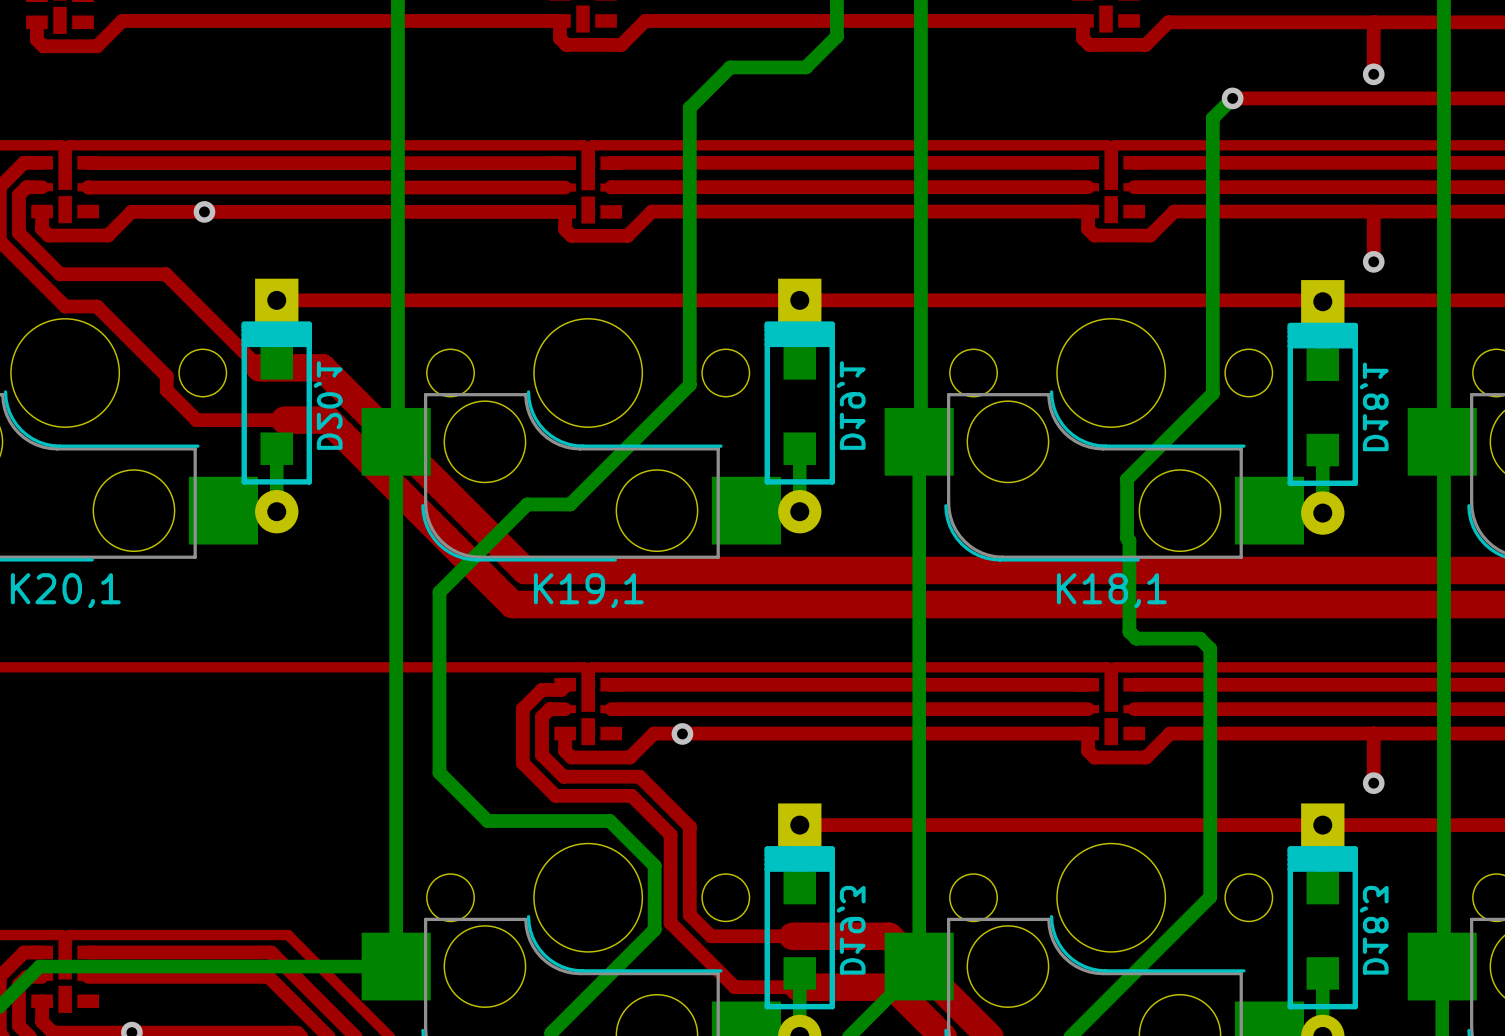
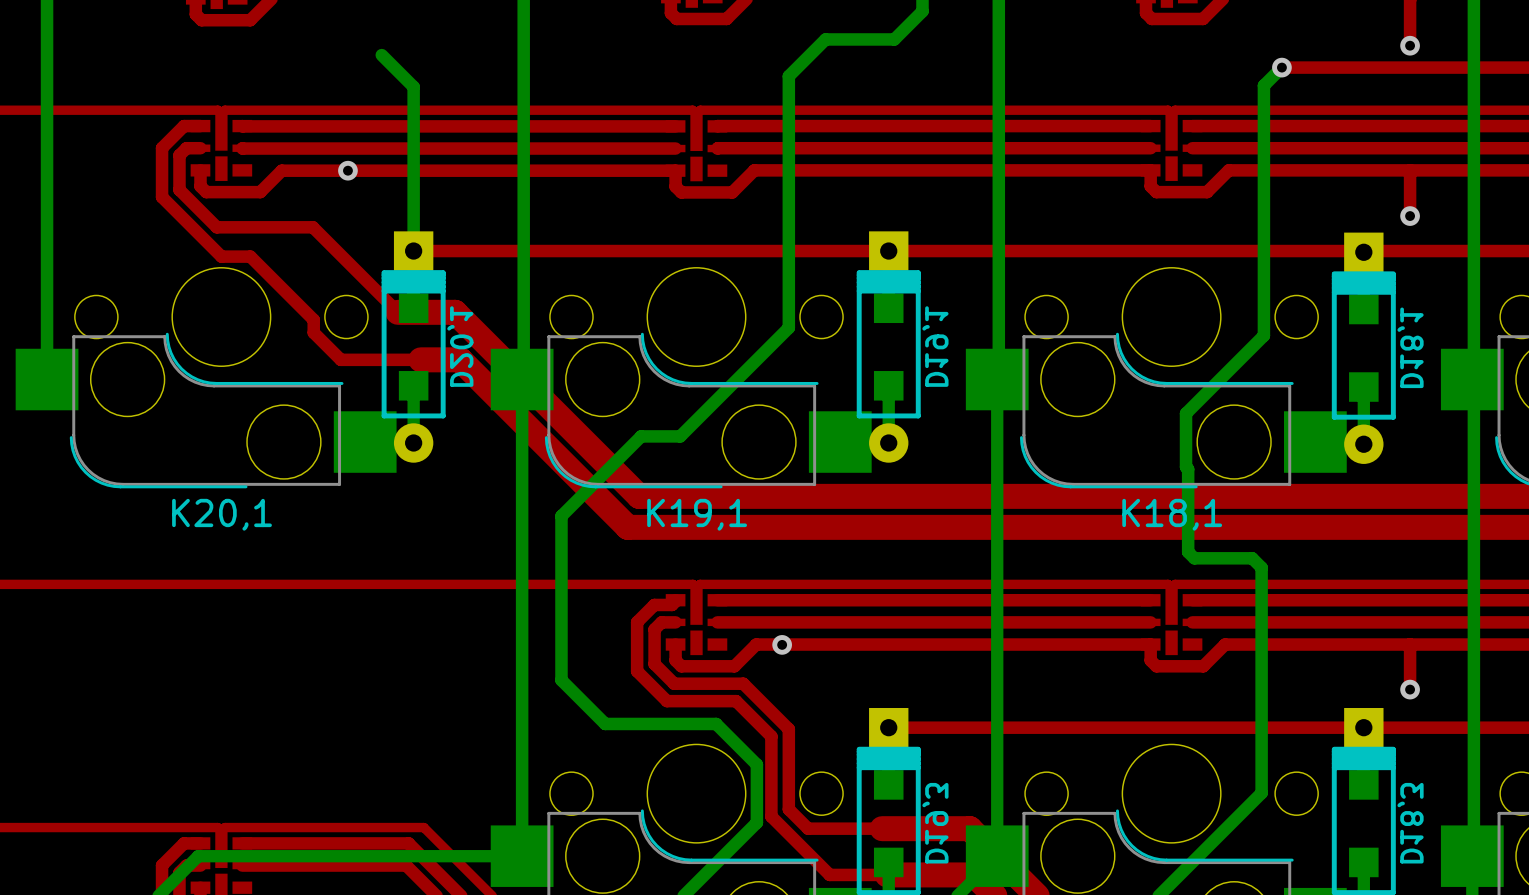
bottom track: none -> (381, 55) (413, 86) (413, 251)

